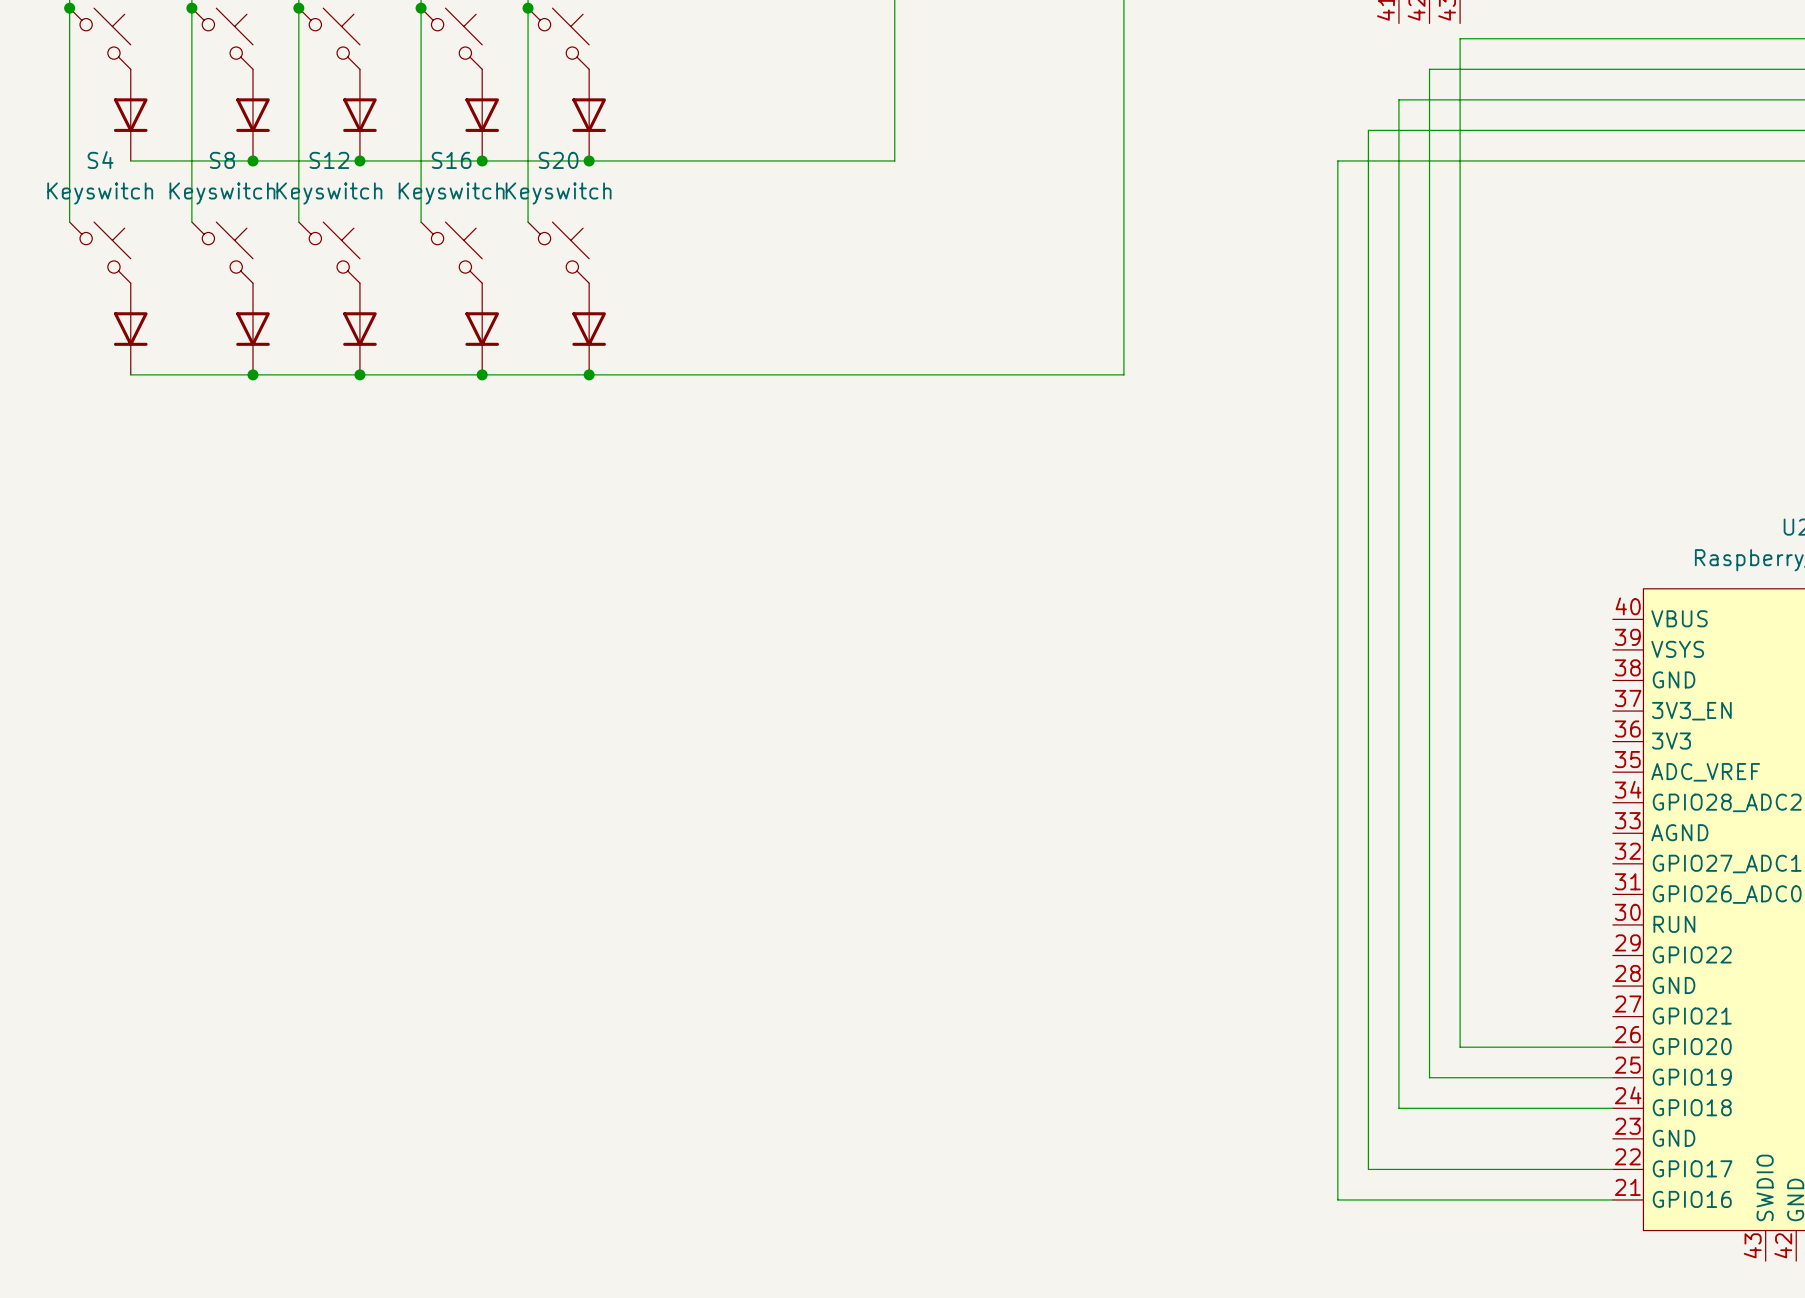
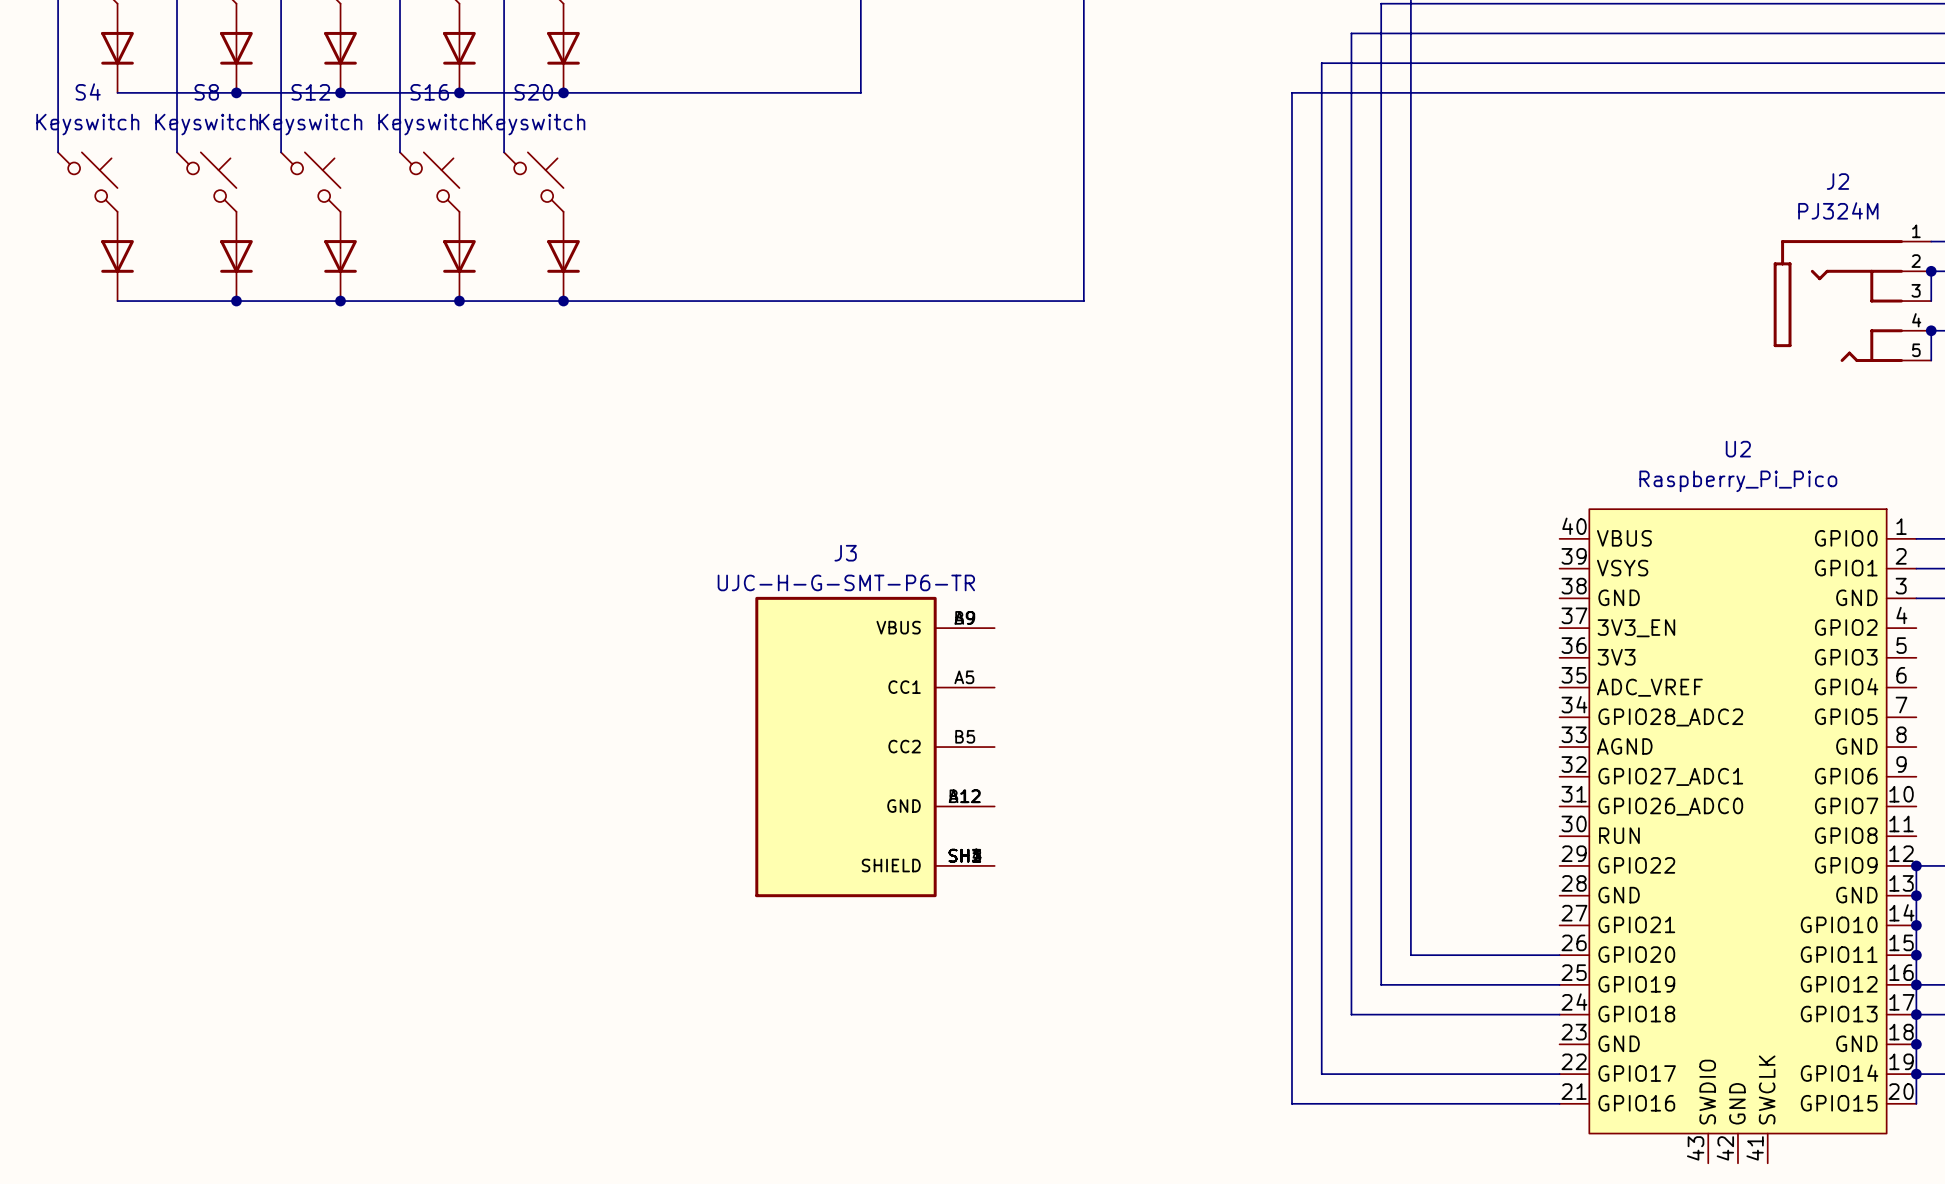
J3: none -> UJC-H-G-SMT-P6-TR (874, 747)

